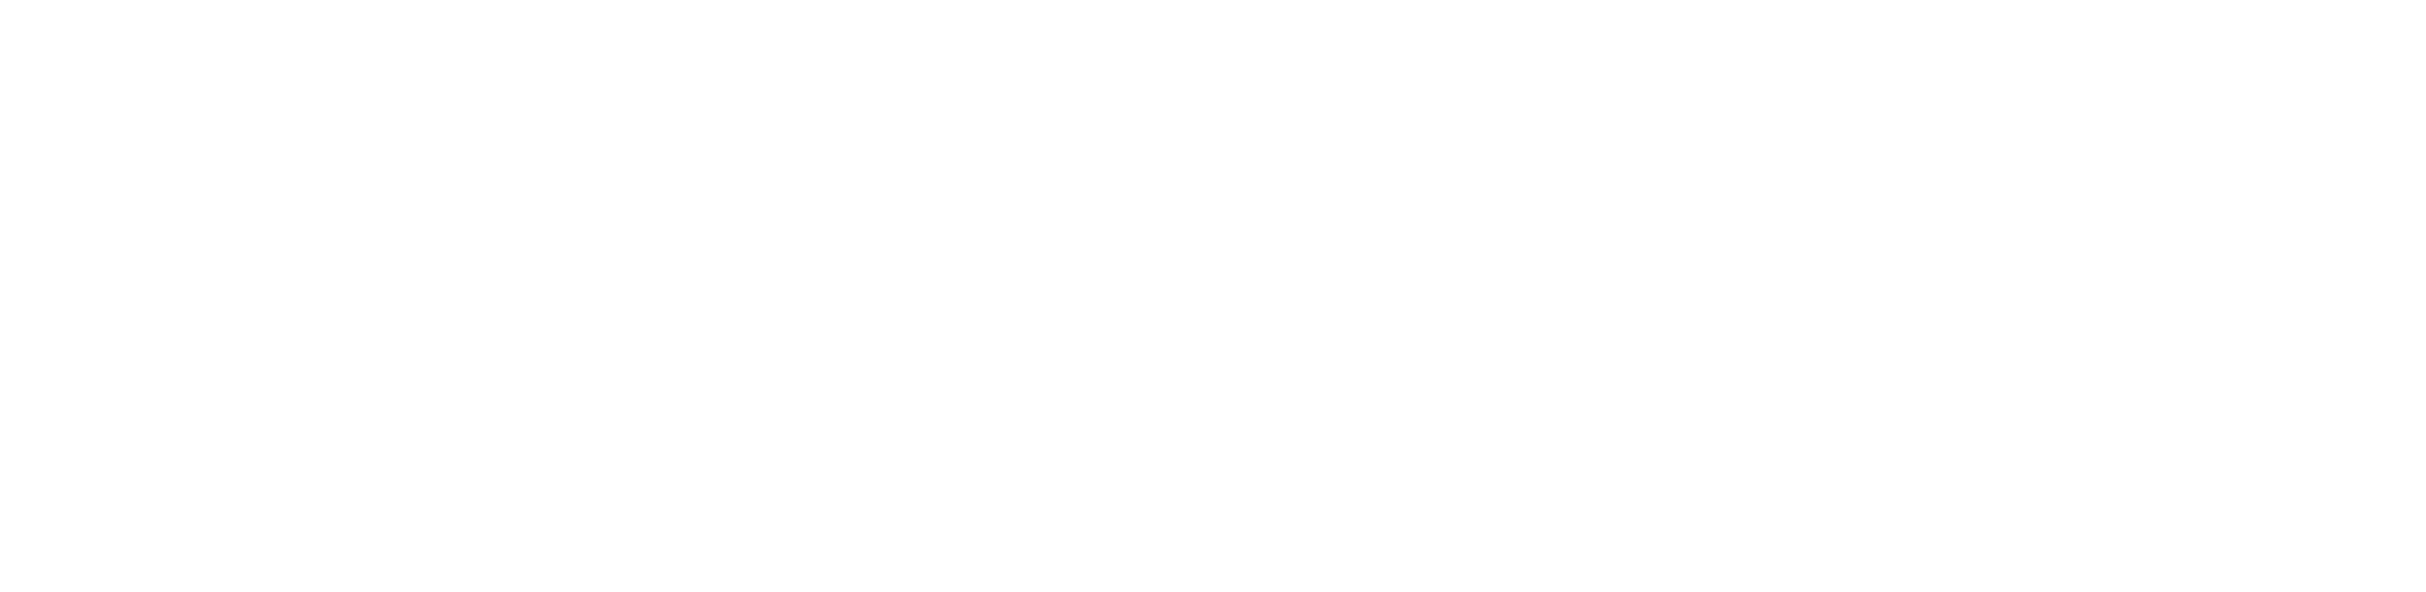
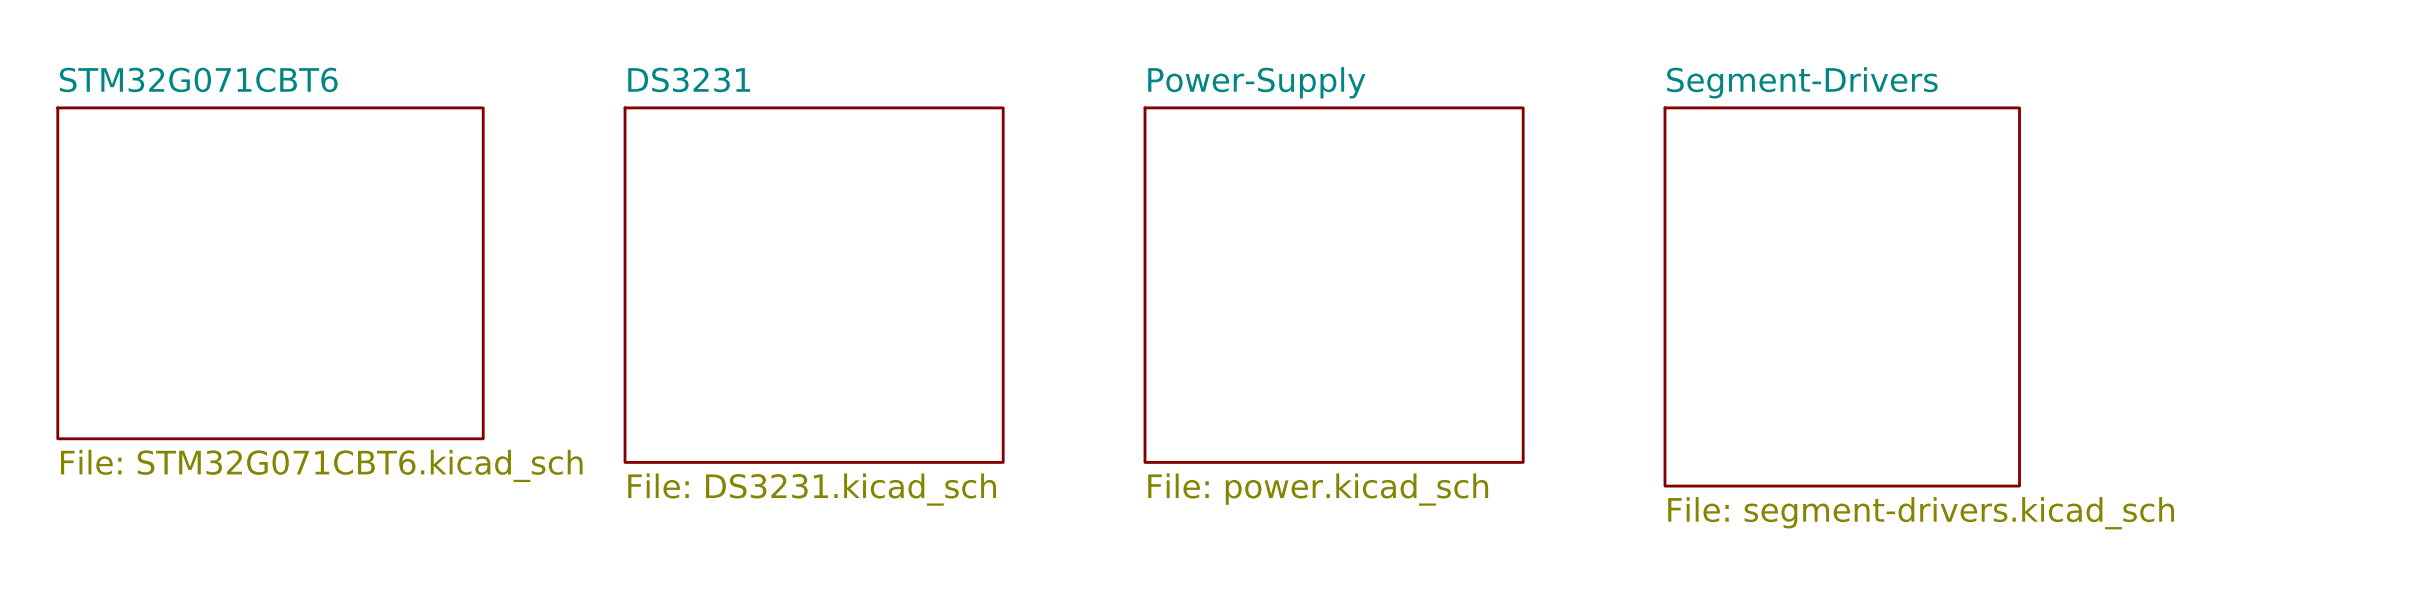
sheet STM32G071CBT6: none -> File: STM32G071CBT6.kicad_sch (270, 273)
sheet DS3231: none -> File: DS3231.kicad_sch (814, 285)
sheet Power-Supply: none -> File: power.kicad_sch (1334, 285)
sheet Segment-Drivers: none -> File: segment-drivers.kicad_sch (1842, 296)

